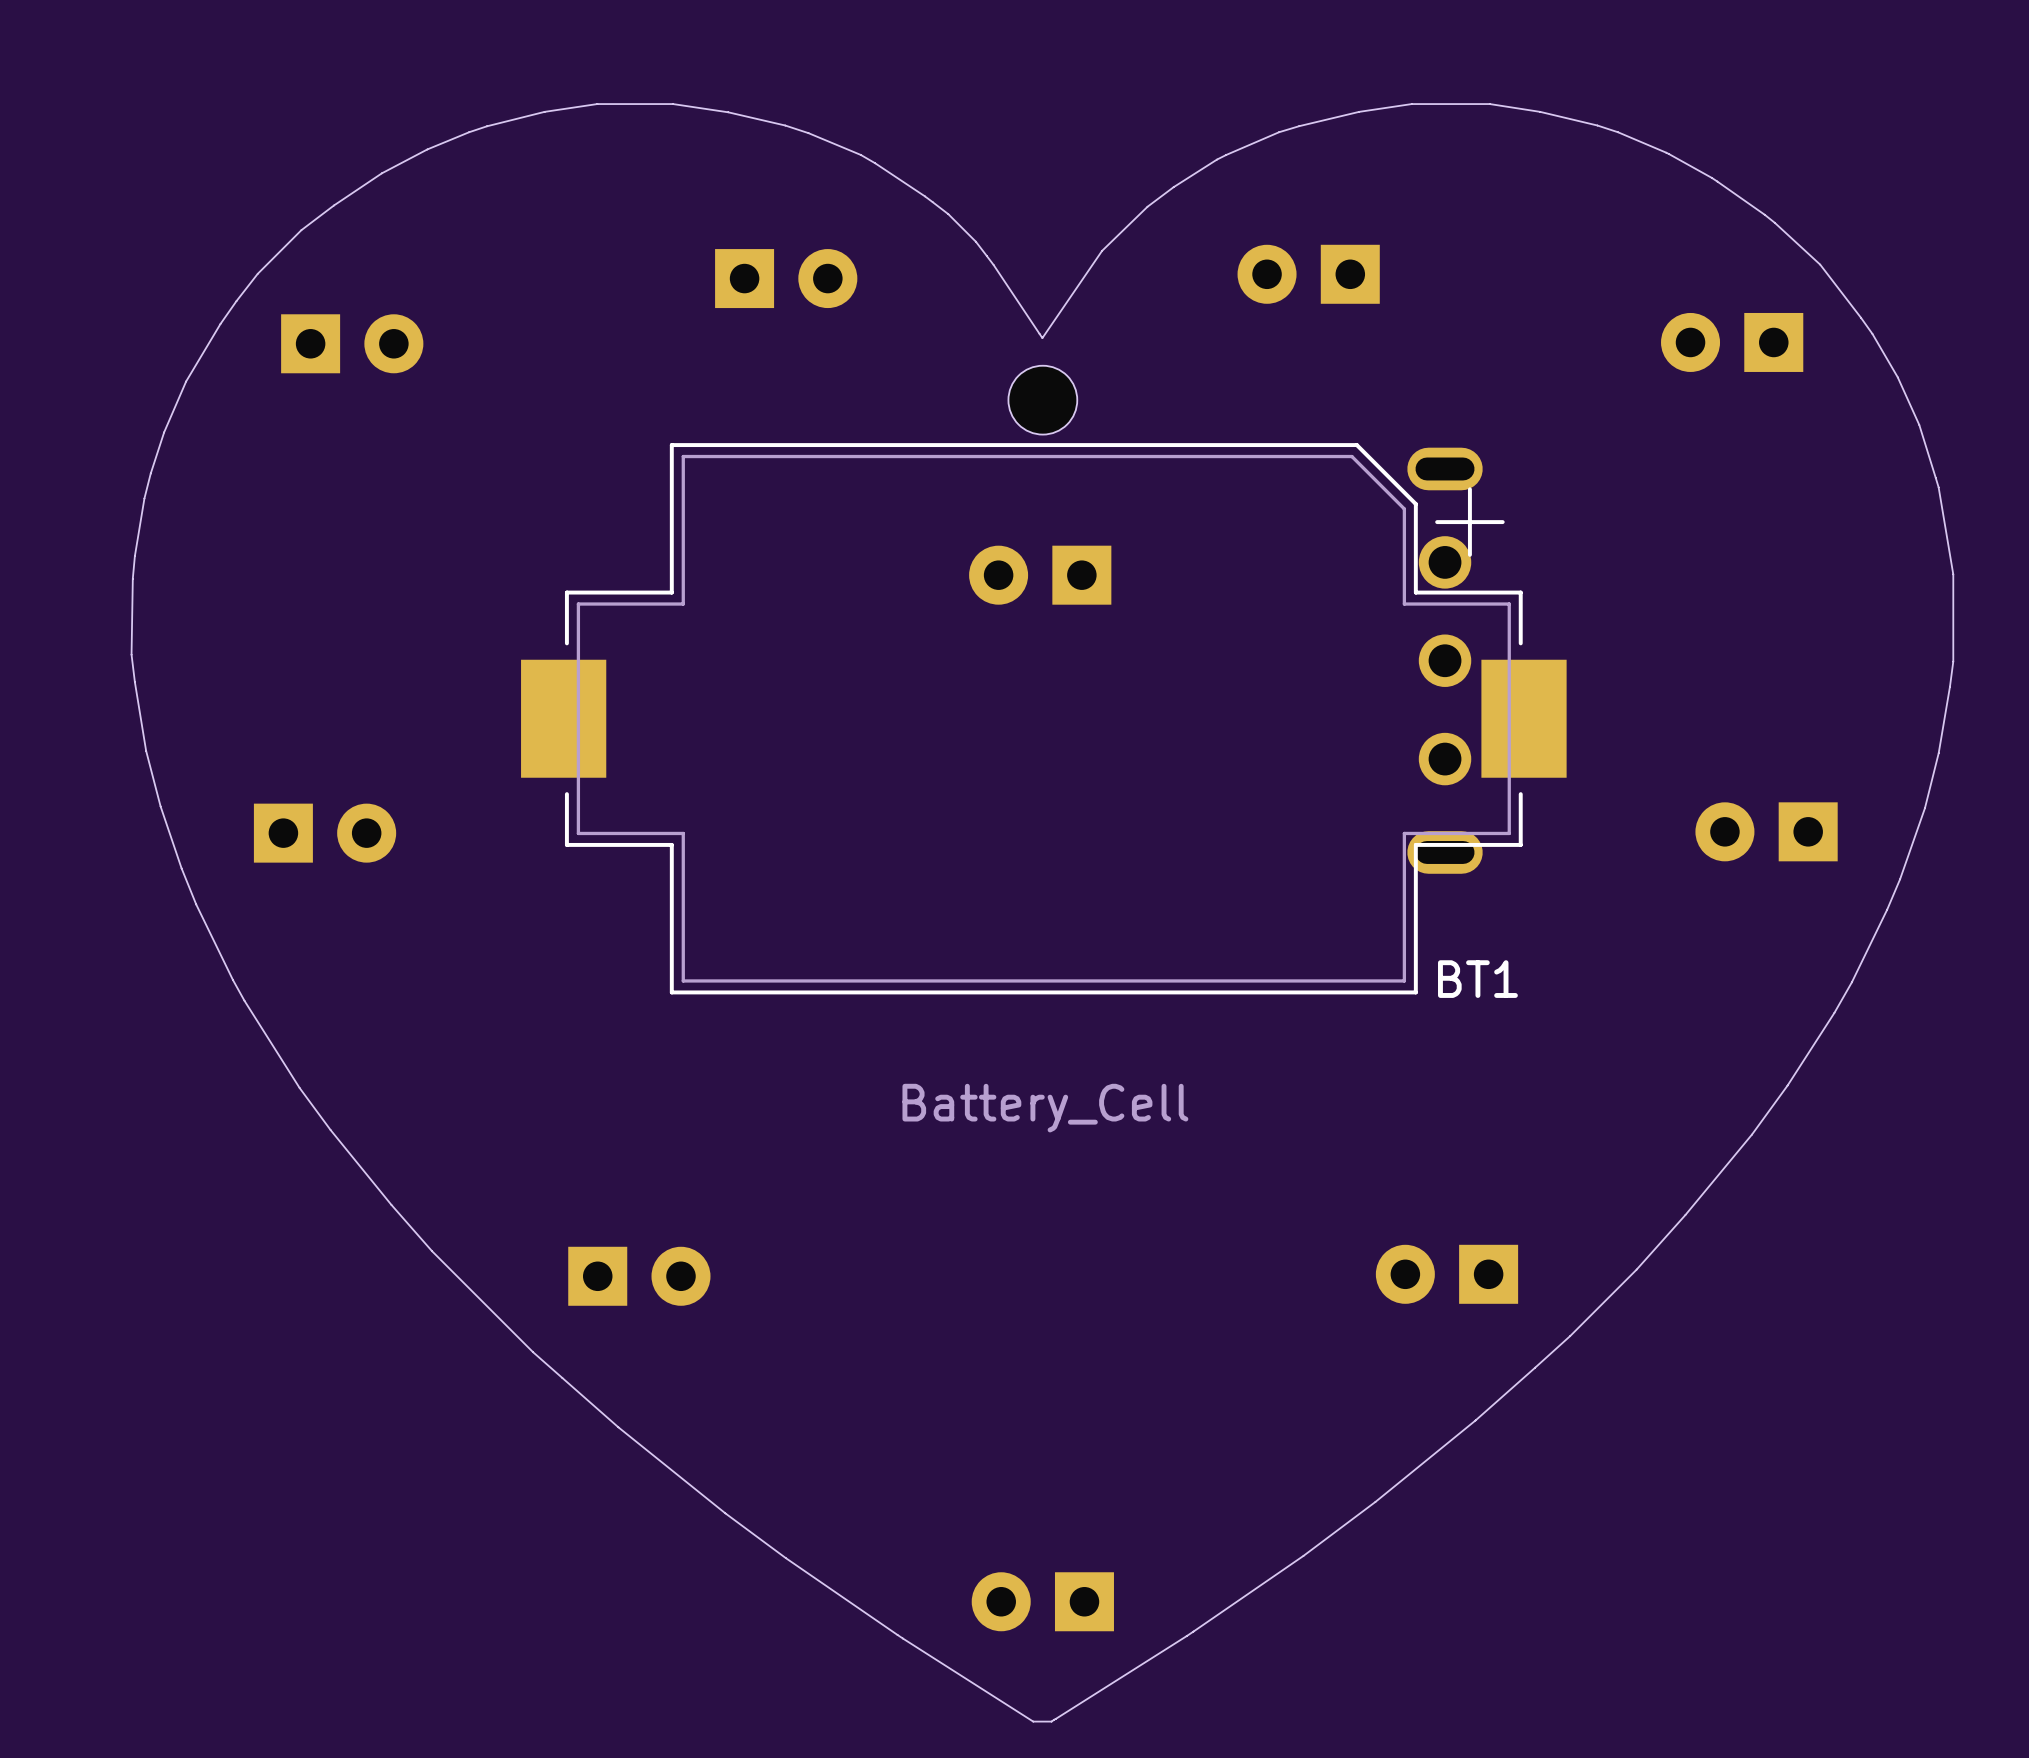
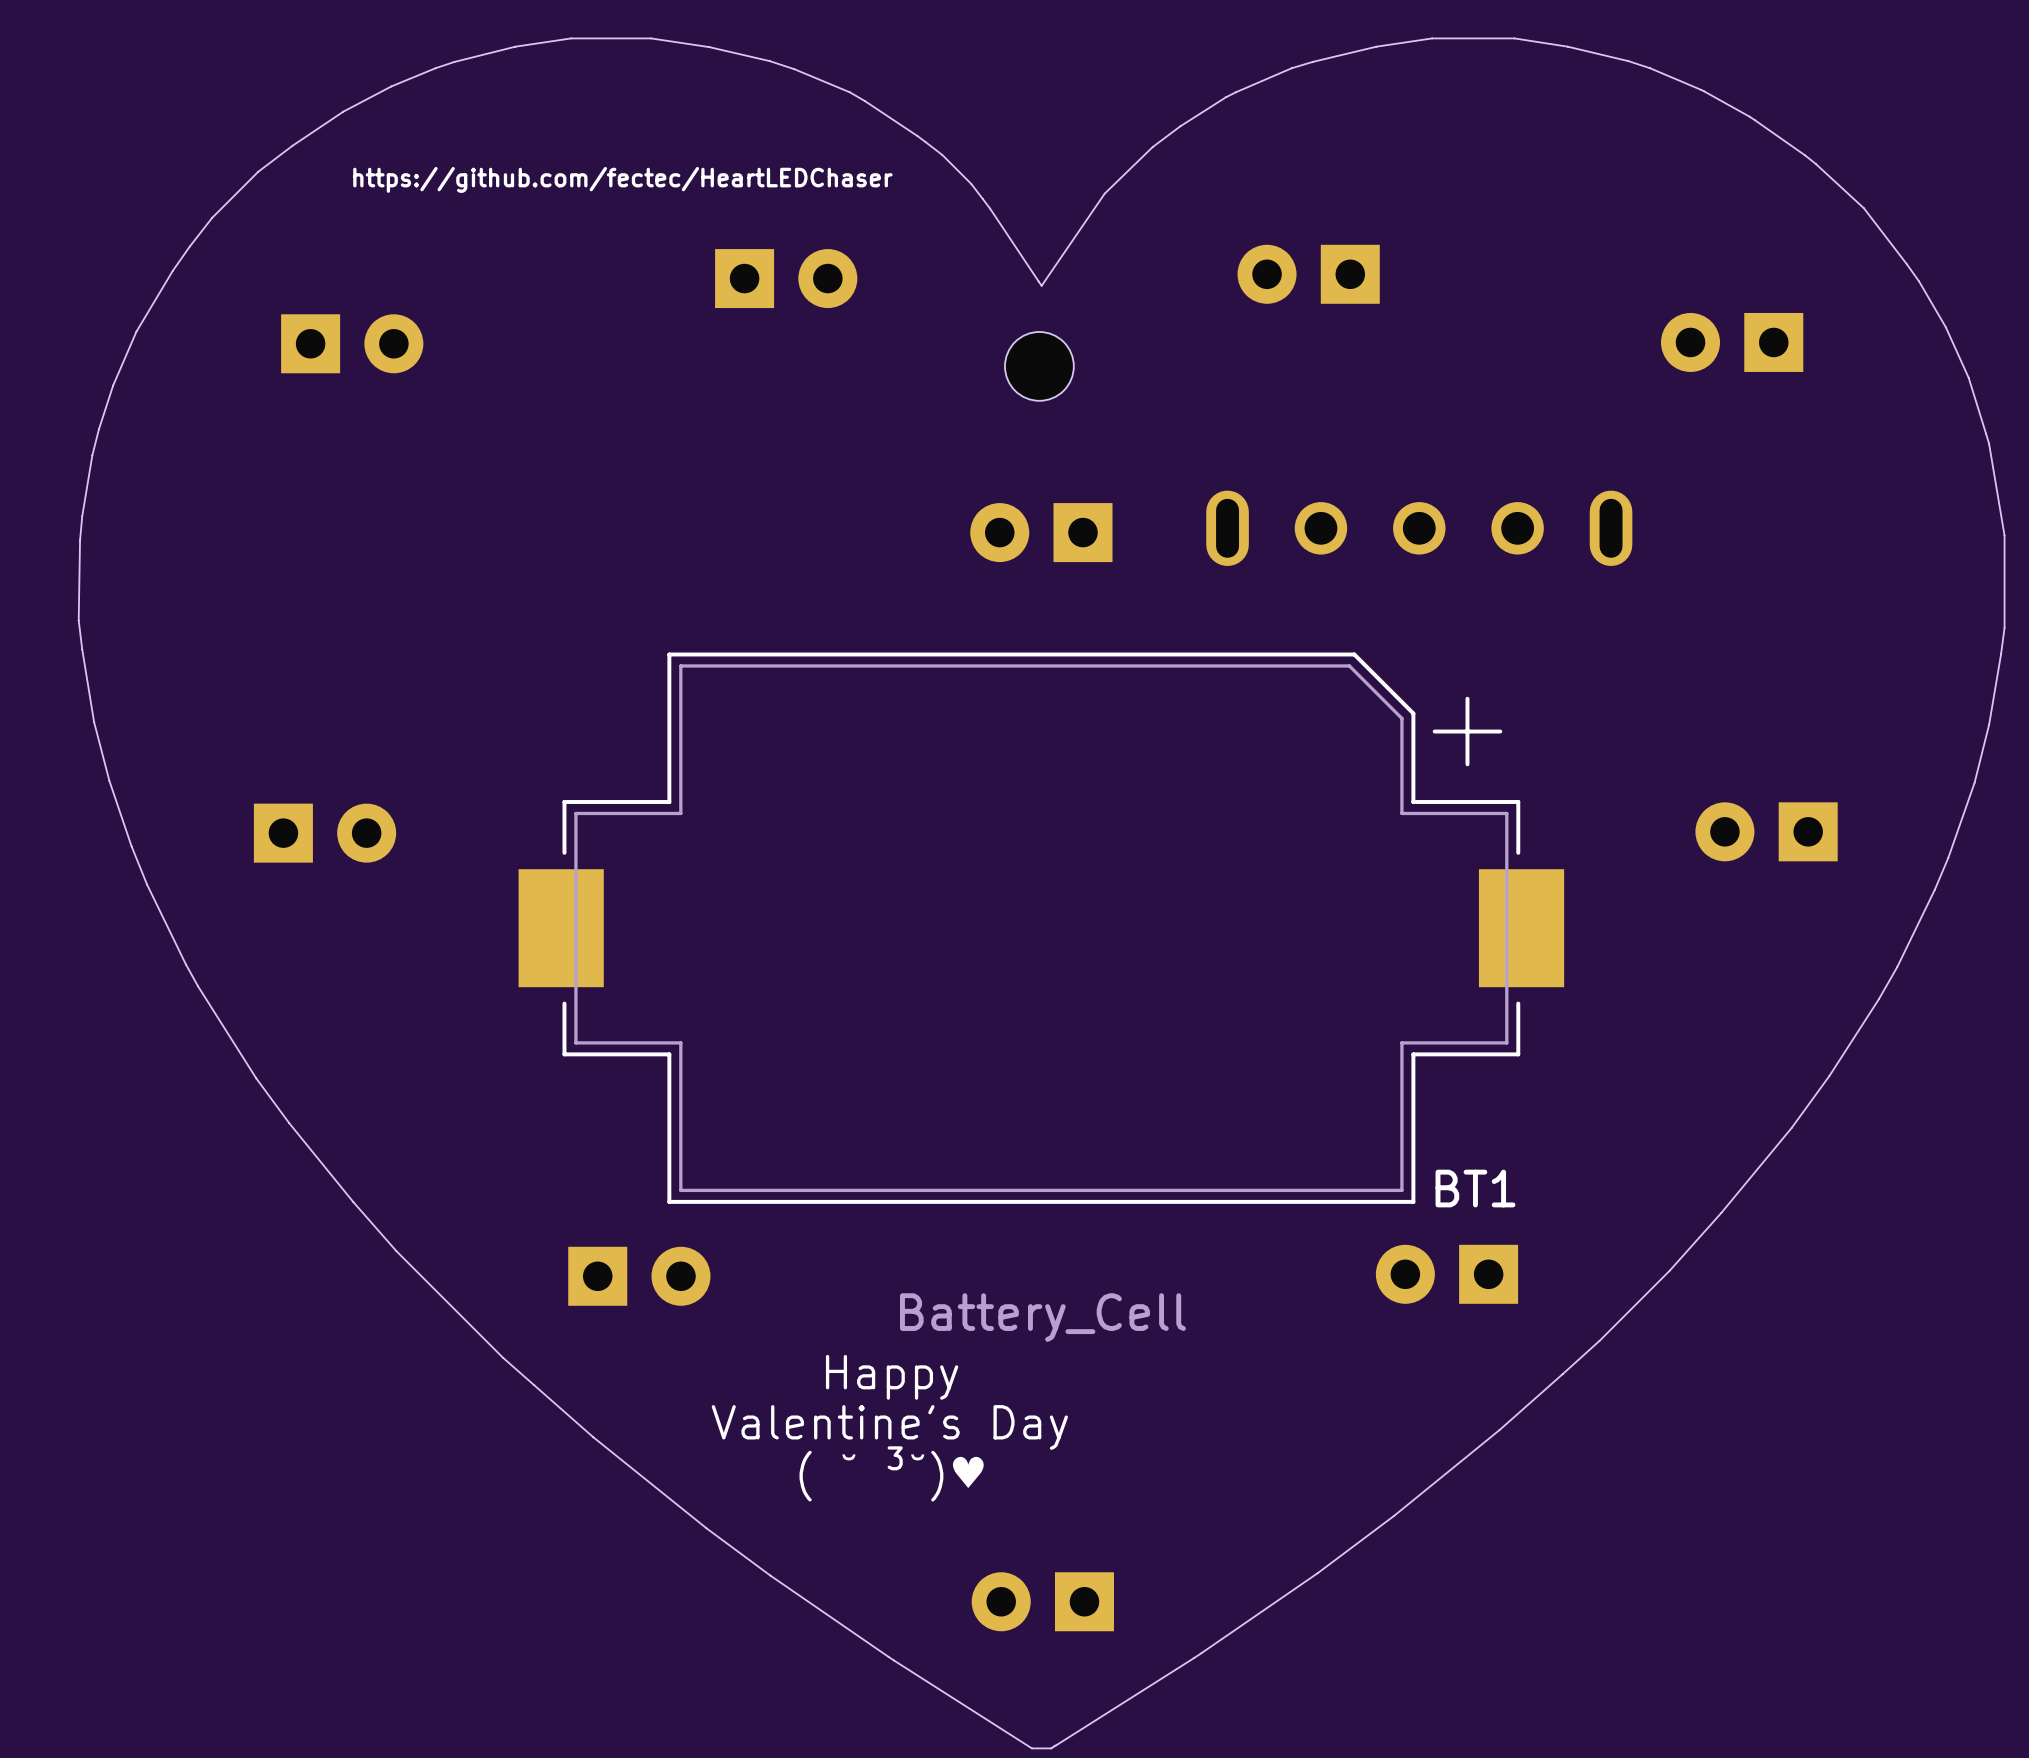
board edge: (1489, 104) (1540, 111) (1618, 132) (1666, 152) (1712, 178) (1774, 222) (1820, 264) (1872, 333) (1897, 377) (1919, 425) (1938, 487) (1953, 574) (1953, 661) (1938, 753) (1924, 808) (1887, 909) (1851, 982) (1834, 1012) (1787, 1085) (1751, 1134) (1685, 1215) (1636, 1269) (1570, 1336) (1475, 1420) (1375, 1501) (1303, 1555) (1186, 1636) (1051, 1721) (1033, 1721) (902, 1638) (785, 1558) (725, 1513) (618, 1427) (533, 1352) (432, 1251) (330, 1130) (299, 1087) (244, 1000) (196, 904) (160, 806) (146, 750) (131, 654) (134, 556) (150, 473) (164, 432) (186, 381) (220, 323) (257, 273) (301, 230) (381, 173) (427, 149) (486, 126) (544, 111) (597, 104) (673, 104) (728, 112) (785, 125) (808, 133) (860, 154) (924, 196) (948, 214) (975, 241) (986, 255) (1042, 338) (1102, 250) (1147, 206) (1173, 187) (1217, 159) (1278, 132) (1359, 111) (1411, 104) (1489, 104) -> (1514, 38) (1567, 46) (1650, 68) (1701, 89) (1749, 116) (1815, 163) (1863, 208) (1919, 281) (1945, 327) (1968, 377) (1989, 443) (2004, 535) (2004, 627) (1989, 724) (1974, 782) (1948, 858) (1934, 890) (1897, 967) (1878, 999) (1829, 1076) (1791, 1127) (1721, 1212) (1669, 1270) (1599, 1340) (1499, 1430) (1393, 1516) (1317, 1573) (1194, 1658) (1051, 1748) (1031, 1748) (894, 1660) (770, 1575) (706, 1528) (593, 1437) (503, 1357) (396, 1251) (353, 1202) (289, 1123) (256, 1078) (198, 986) (147, 884) (131, 846) (109, 780) (94, 722) (78, 620) (82, 516) (92, 455) (98, 429) (113, 385) (136, 331) (172, 270) (212, 217) (258, 171) (343, 111) (391, 86) (454, 61) (515, 46) (571, 38) (651, 38) (709, 47) (769, 61) (794, 69) (849, 92) (917, 136) (942, 154) (971, 183) (982, 199) (1041, 285) (1104, 193) (1152, 146) (1180, 126) (1226, 97) (1291, 68) (1376, 46) (1432, 38) (1514, 38)
text: none -> https://github.com/fectec/HeartLEDChaser (622, 179)
part position: (1042, 400) -> (1039, 366)
part position: (1040, 575) -> (1041, 532)
part rotation: 0° (1445, 660) -> 90° clockwise (1419, 528)
BT1 position: (1043, 718) -> (1041, 928)
text: none -> Happy (892, 1377)
text: none -> Valentine's Day (889, 1427)
text: none -> ( ˘ ³˘)♥ (892, 1473)

